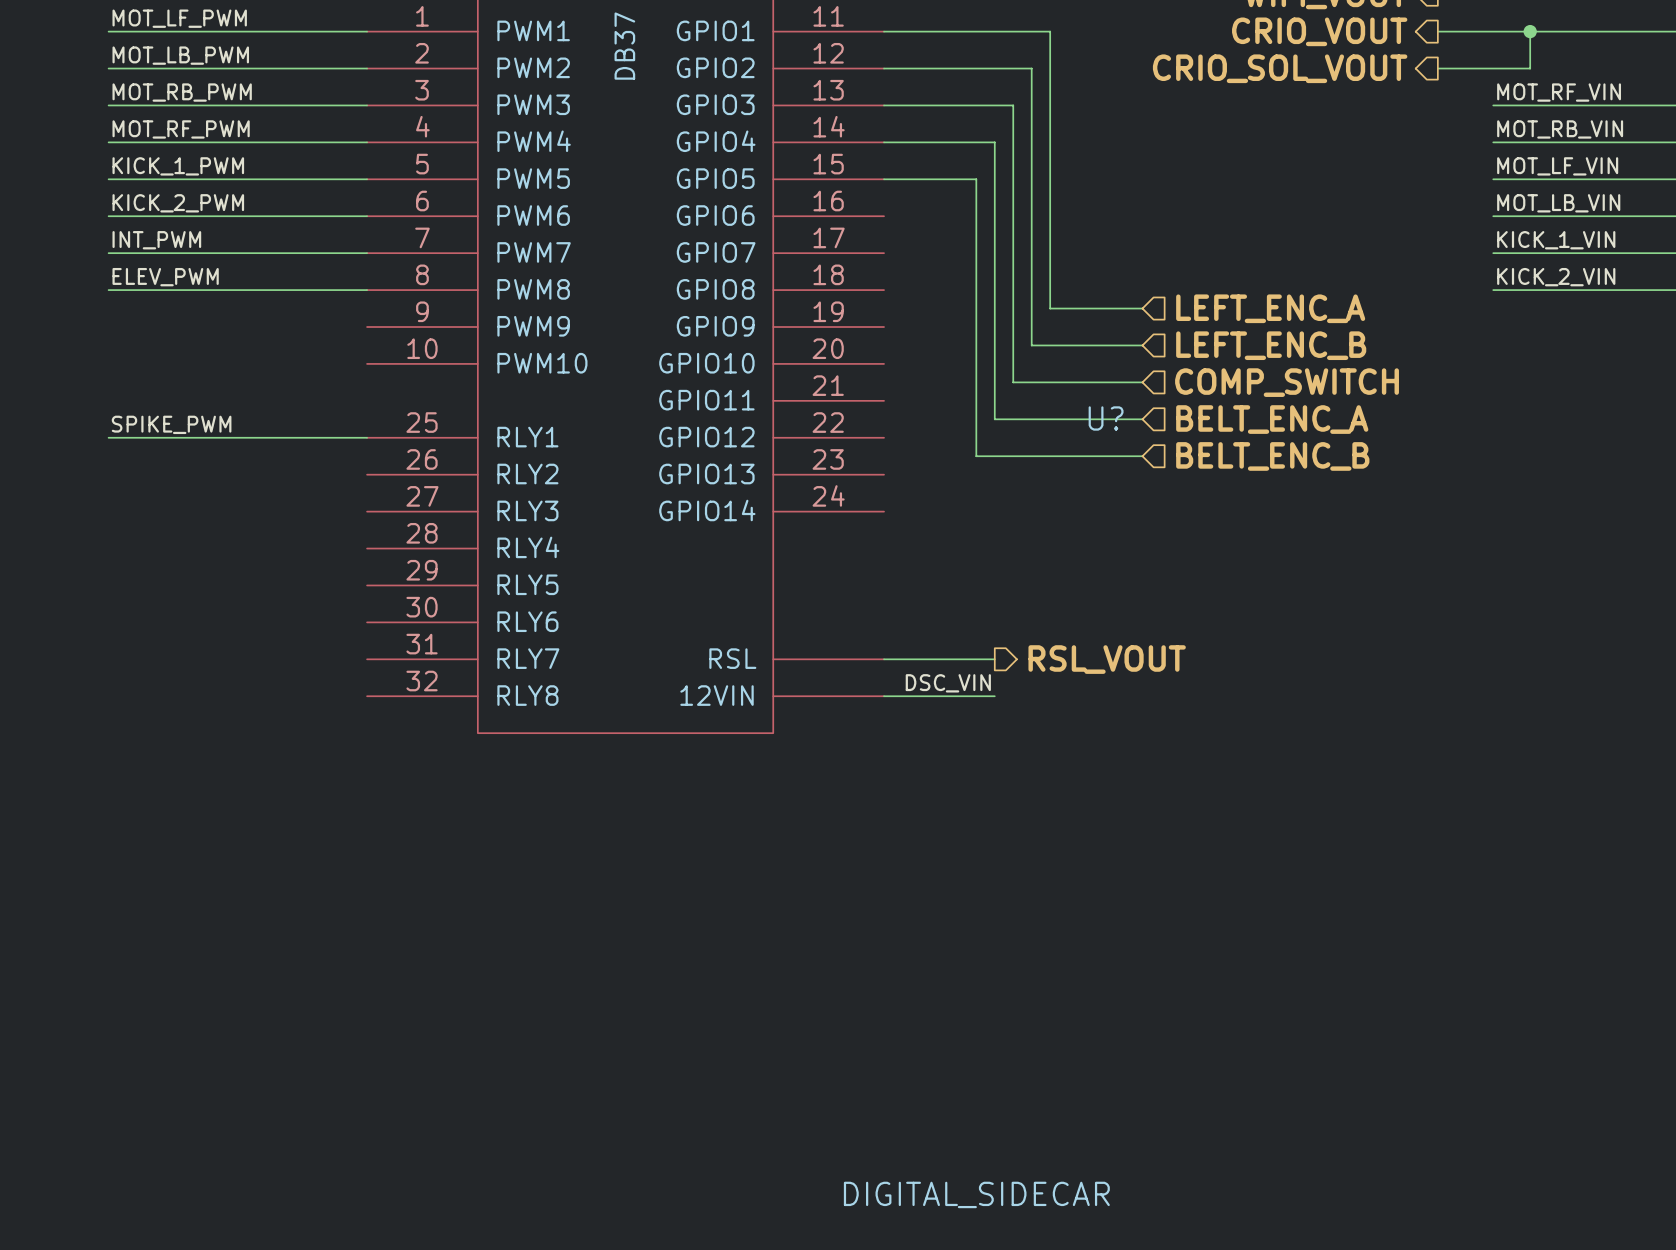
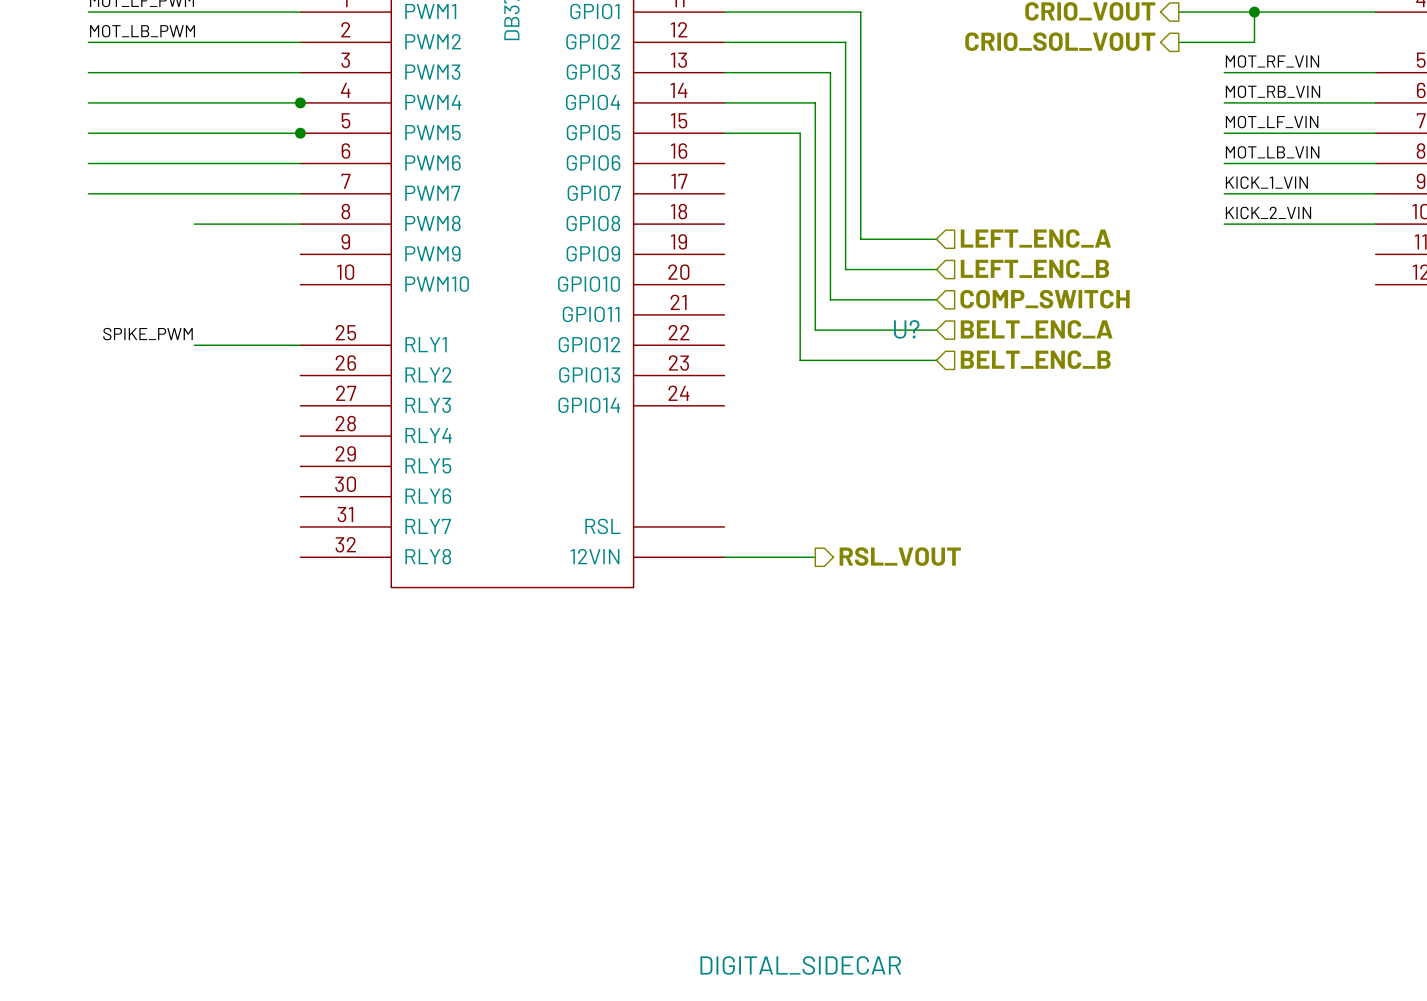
label: MOT_RB_PWM (182, 92) -> none
label: MOT_RF_PWM (181, 129) -> none
junction: none -> (300, 102)
label: KICK_1_PWM (178, 166) -> none
junction: none -> (300, 133)
label: KICK_2_PWM (178, 203) -> none
label: INT_PWM (156, 240) -> none
label: ELEV_PWM (165, 277) -> none
wire: (108, 290) (237, 290) -> none
label position: SPIKE_PWM (171, 424) -> SPIKE_PWM (148, 334)
wire: (108, 437) (237, 437) -> none
wire: (884, 659) (994, 659) -> none
hierarchical label position: RSL_VOUT (1107, 659) -> RSL_VOUT (900, 556)
label: DSC_VIN (948, 683) -> none

